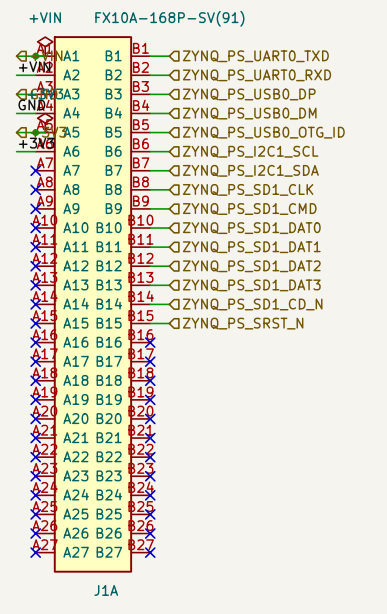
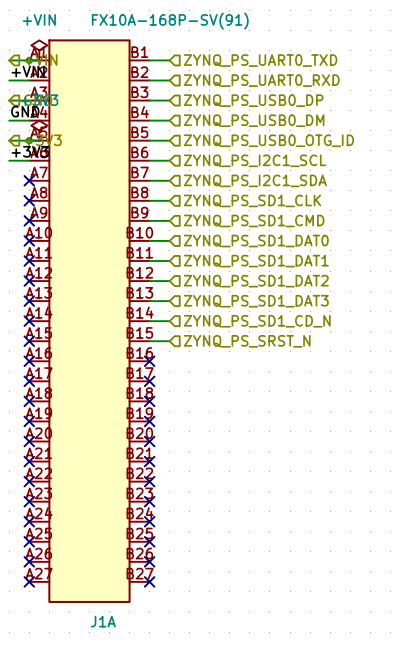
J1A symbol: [35, 36, 151, 573] -> [29, 39, 150, 603]

